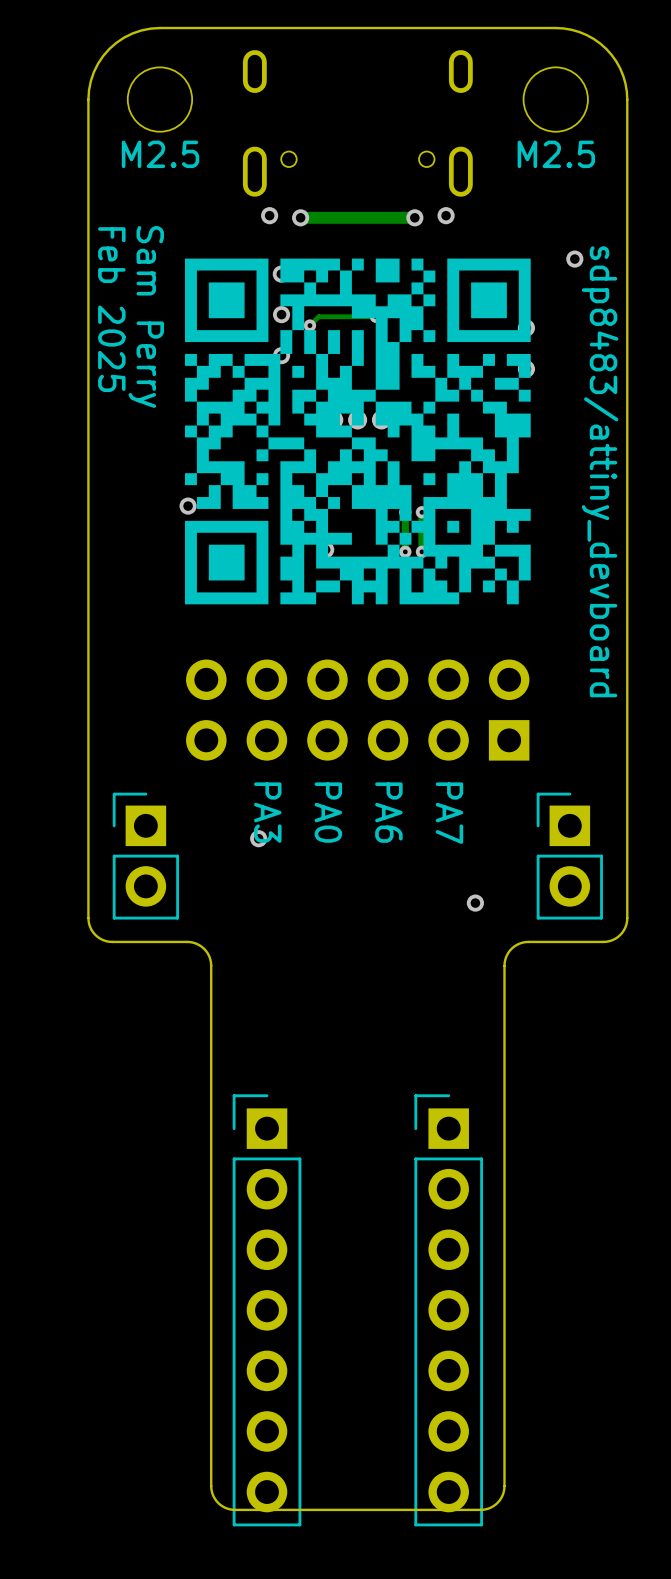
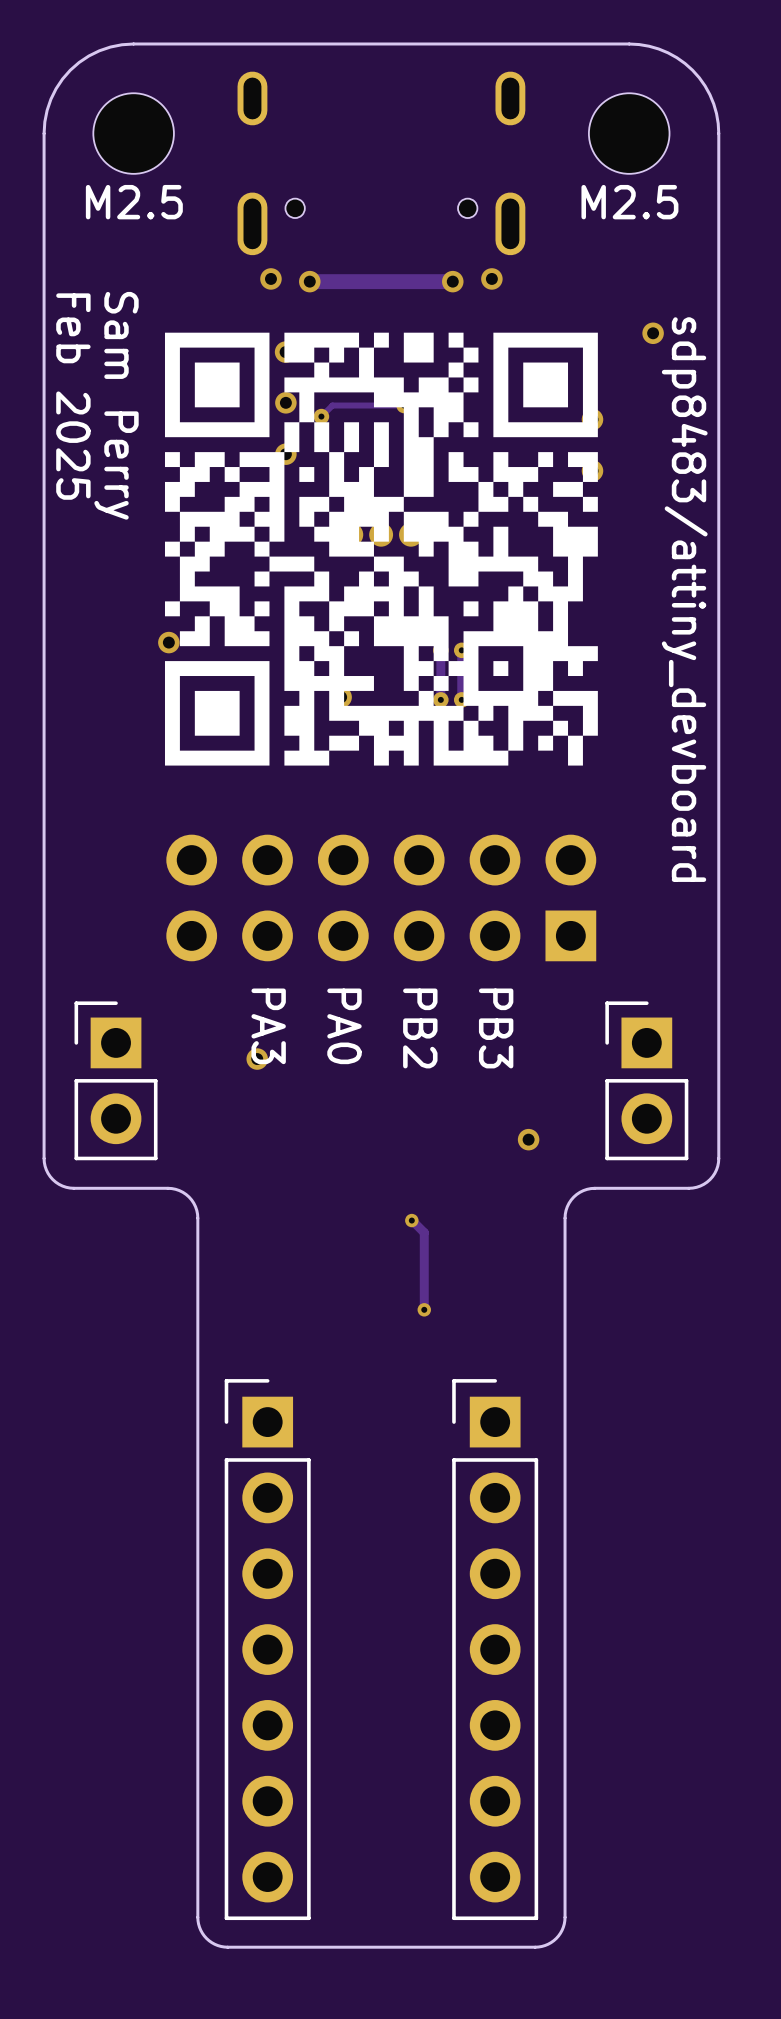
text: PA6 (388, 812) -> PB2 (420, 1028)
text: PA7 (449, 813) -> PB3 (496, 1028)
track: none -> (412, 1220) (424, 1232) (424, 1309)
via: none -> (411, 1220)
via: none -> (424, 1309)
board edge: (504, 1486) (502, 1496) (497, 1502) (490, 1507) (480, 1509) (232, 1509) (222, 1506) (216, 1500) (211, 1486) -> (565, 1869) (563, 1927) (558, 1935) (551, 1942) (535, 1947) (221, 1946) (206, 1938) (199, 1927) (197, 1869)

